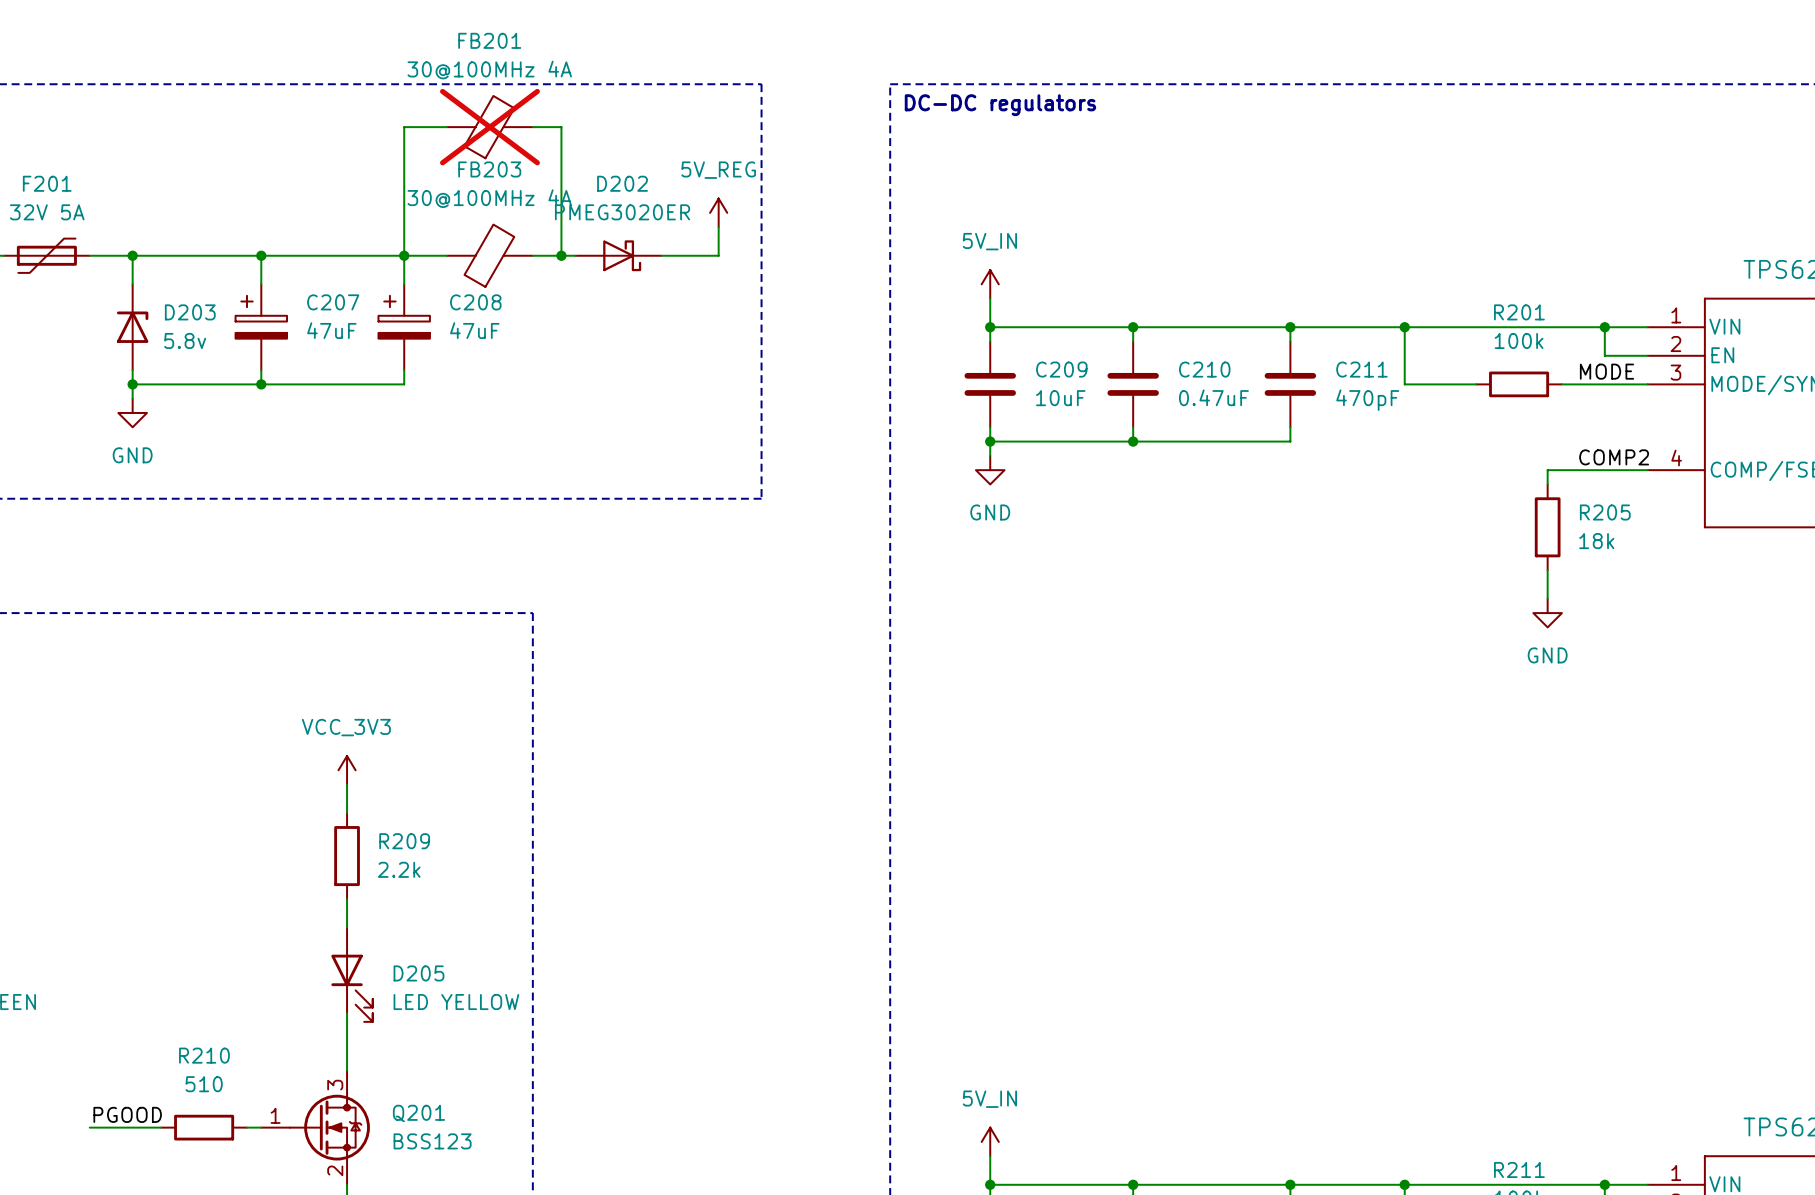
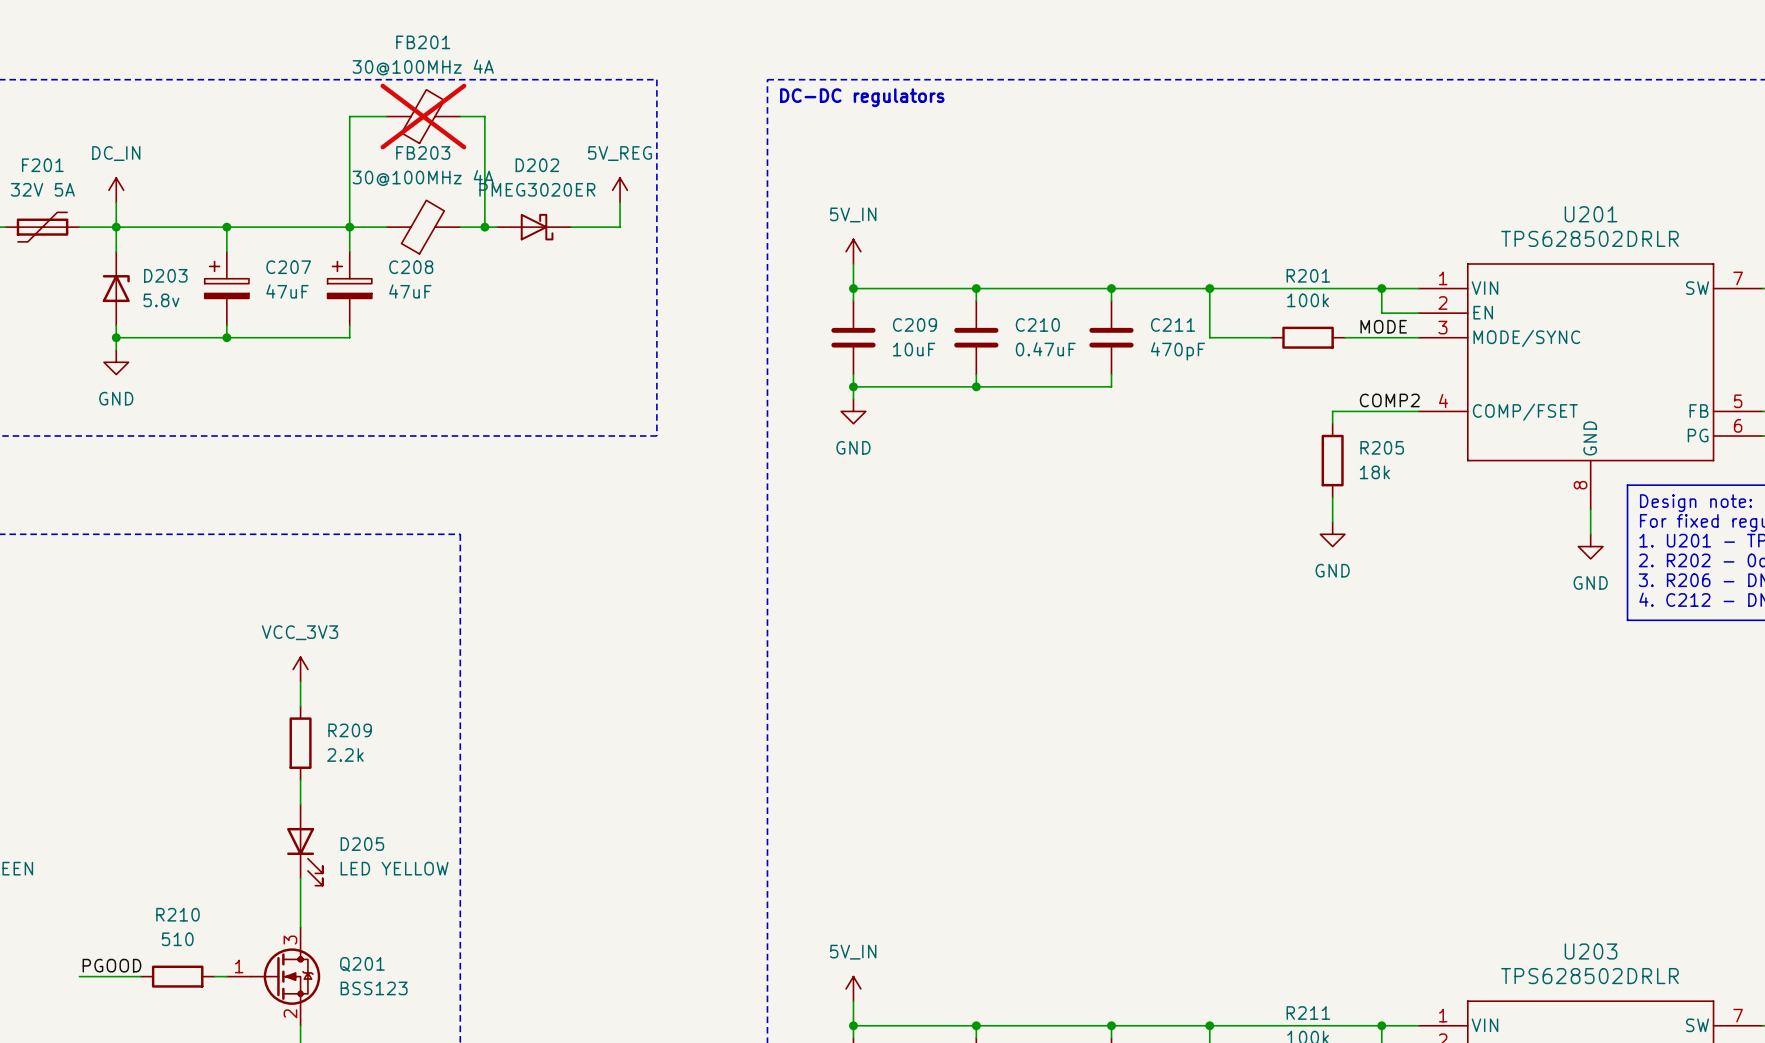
power symbol: none -> DC_IN (116, 190)
wire: none -> (116, 202) (116, 227)

